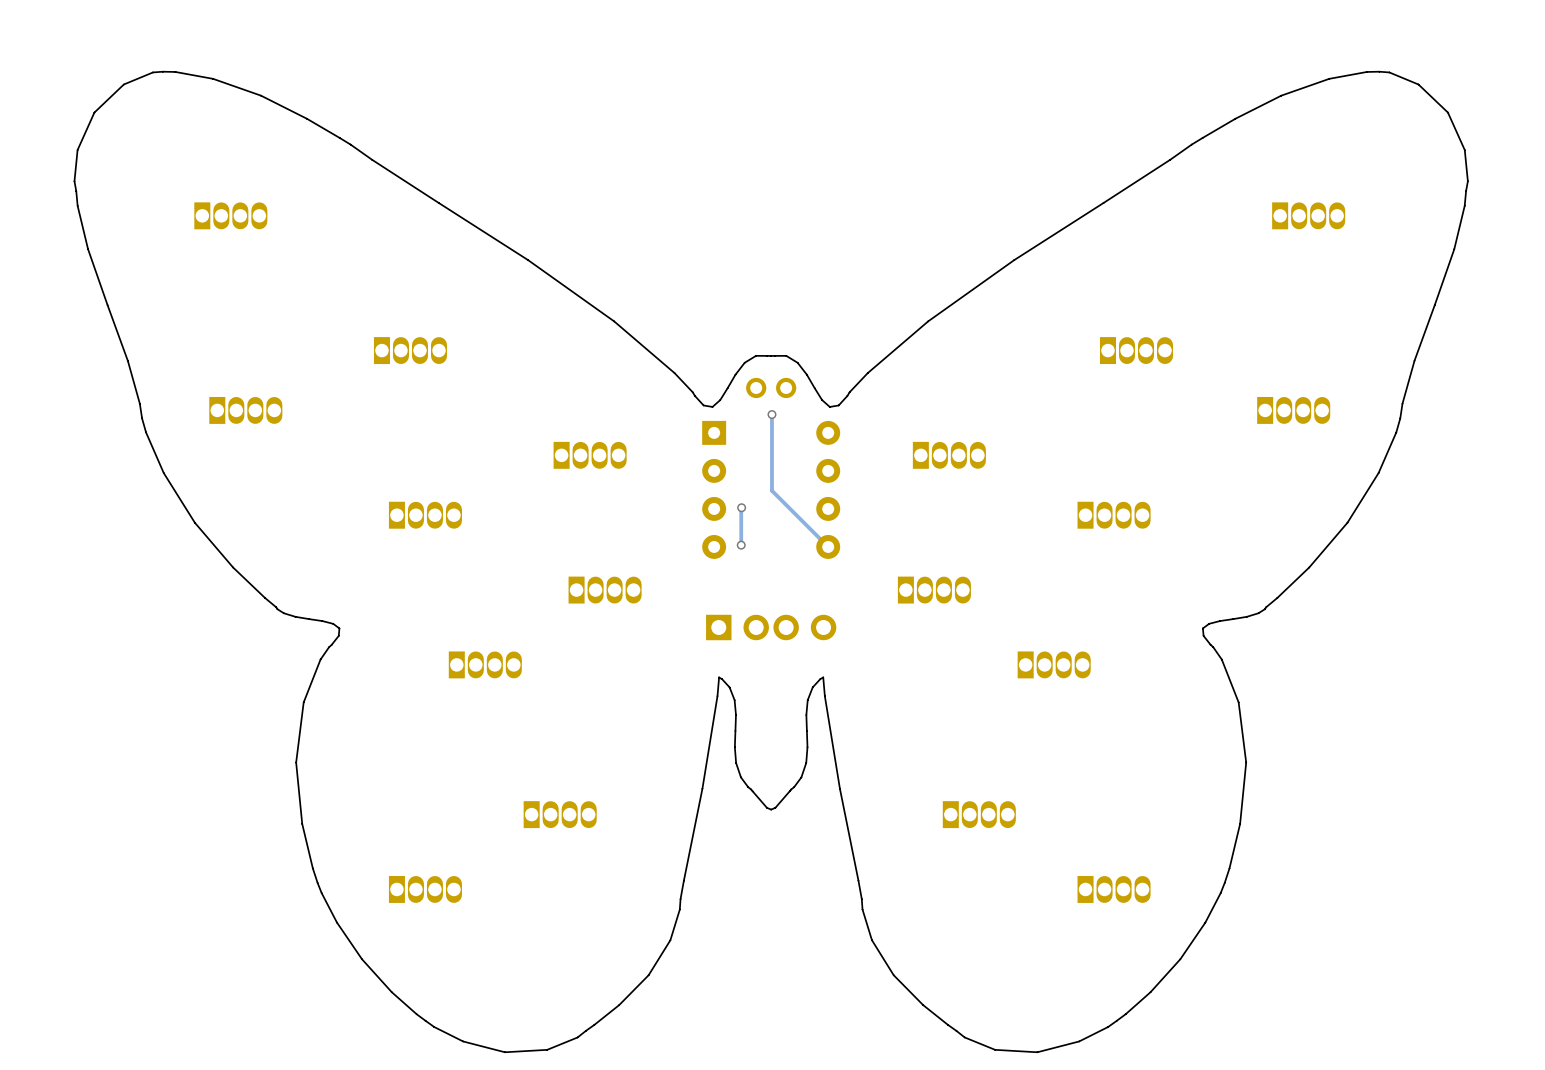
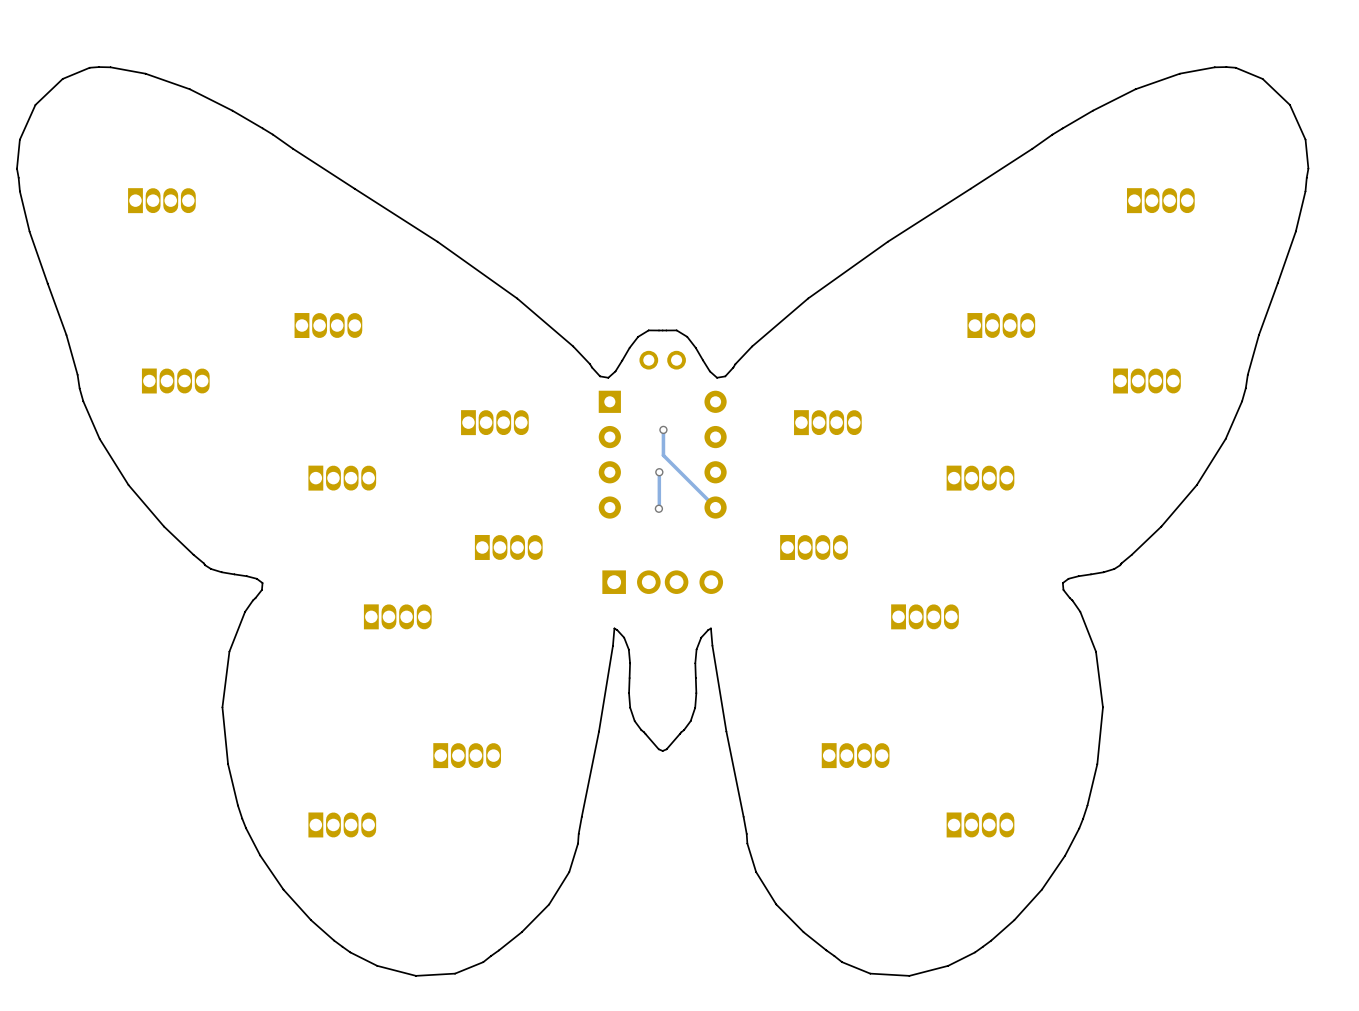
track: (771, 414) (771, 463) -> none
via: (771, 414) -> none
via: none -> (663, 429)
track: (741, 507) (741, 545) -> none
via: (741, 507) -> none
track: none -> (659, 472) (658, 508)
via: none -> (659, 472)
via: (741, 545) -> none
via: none -> (658, 508)

